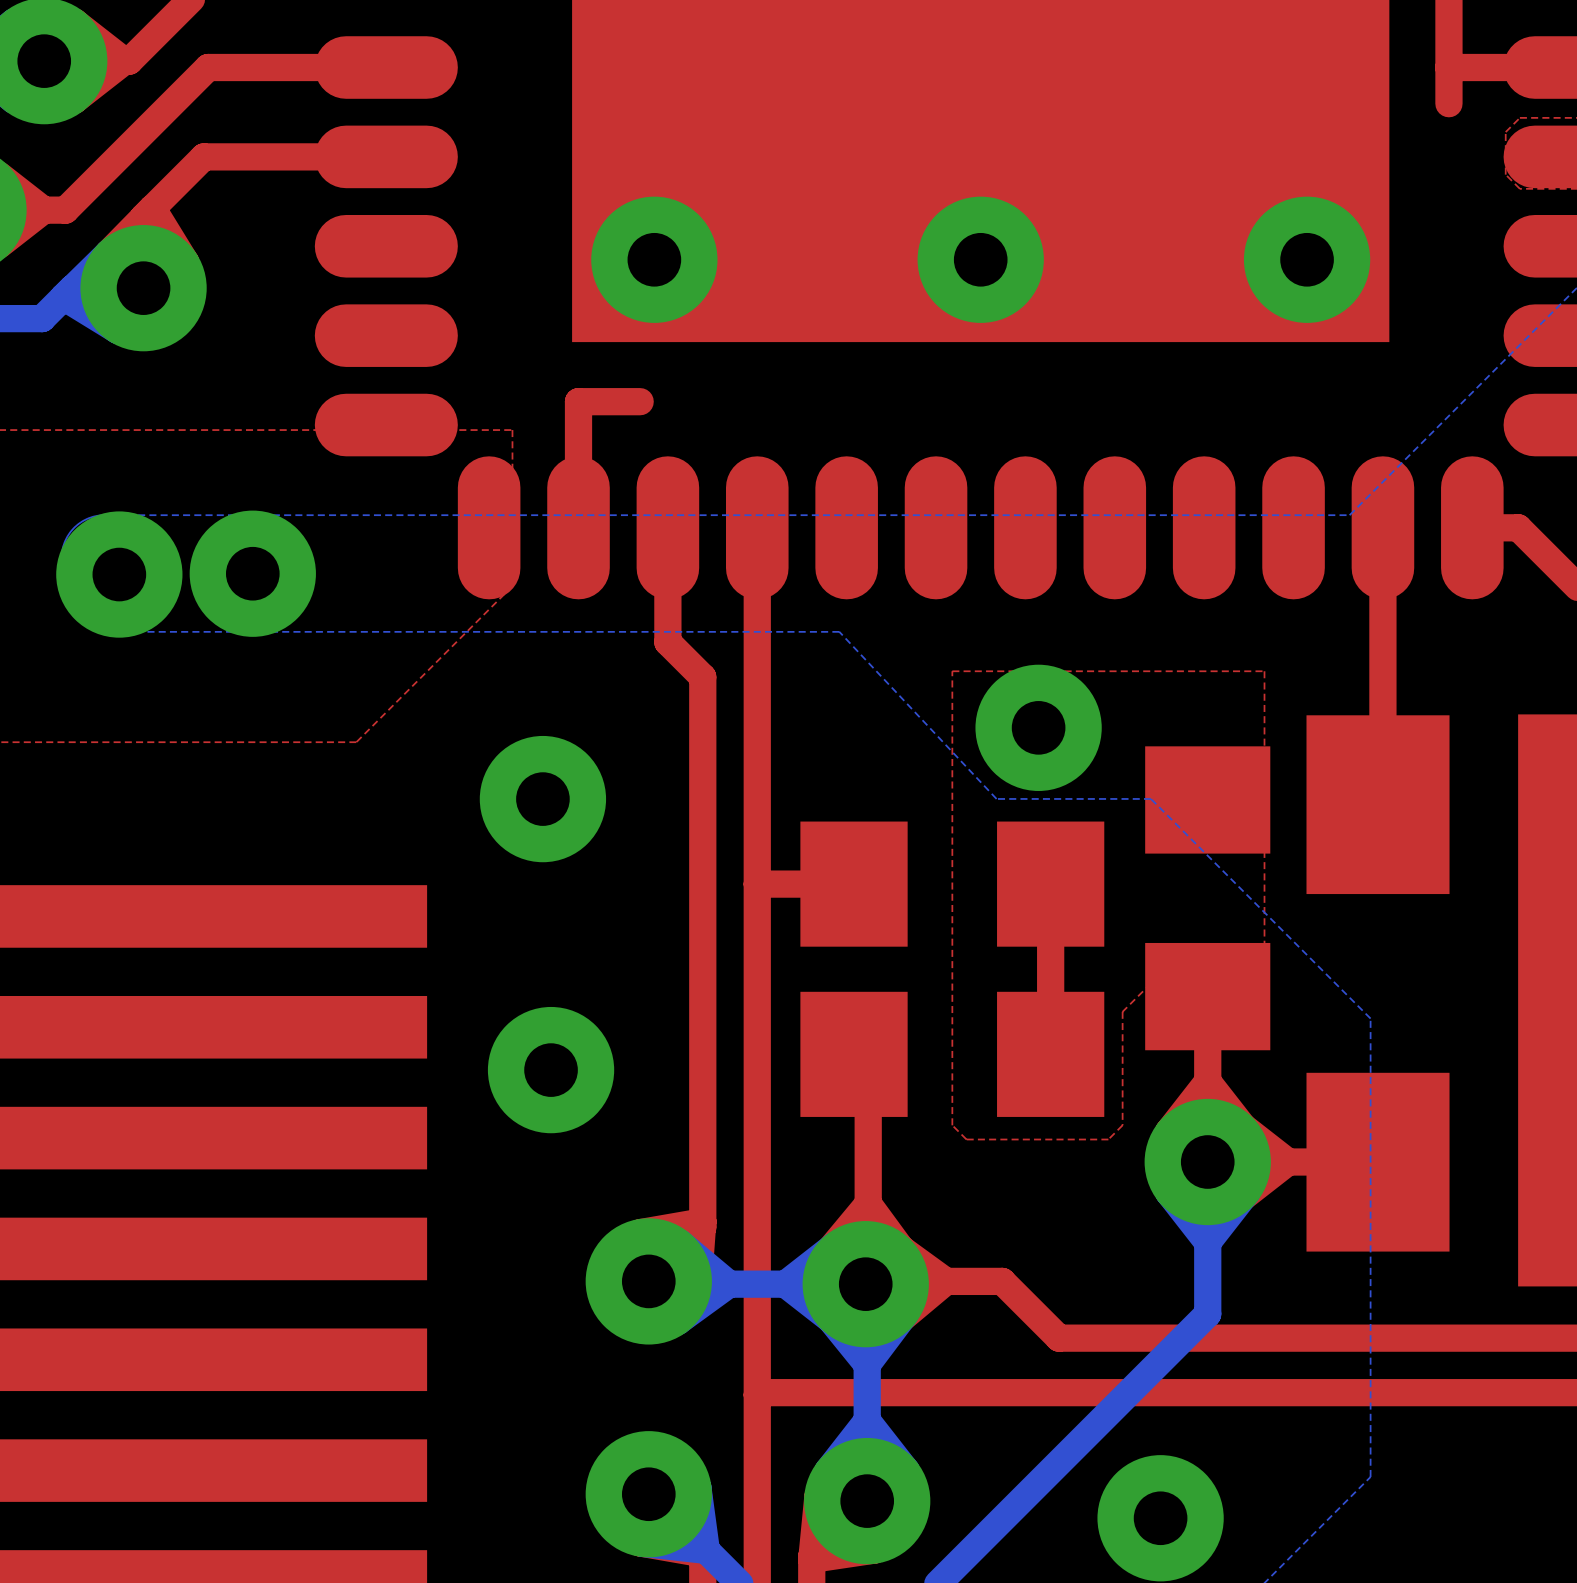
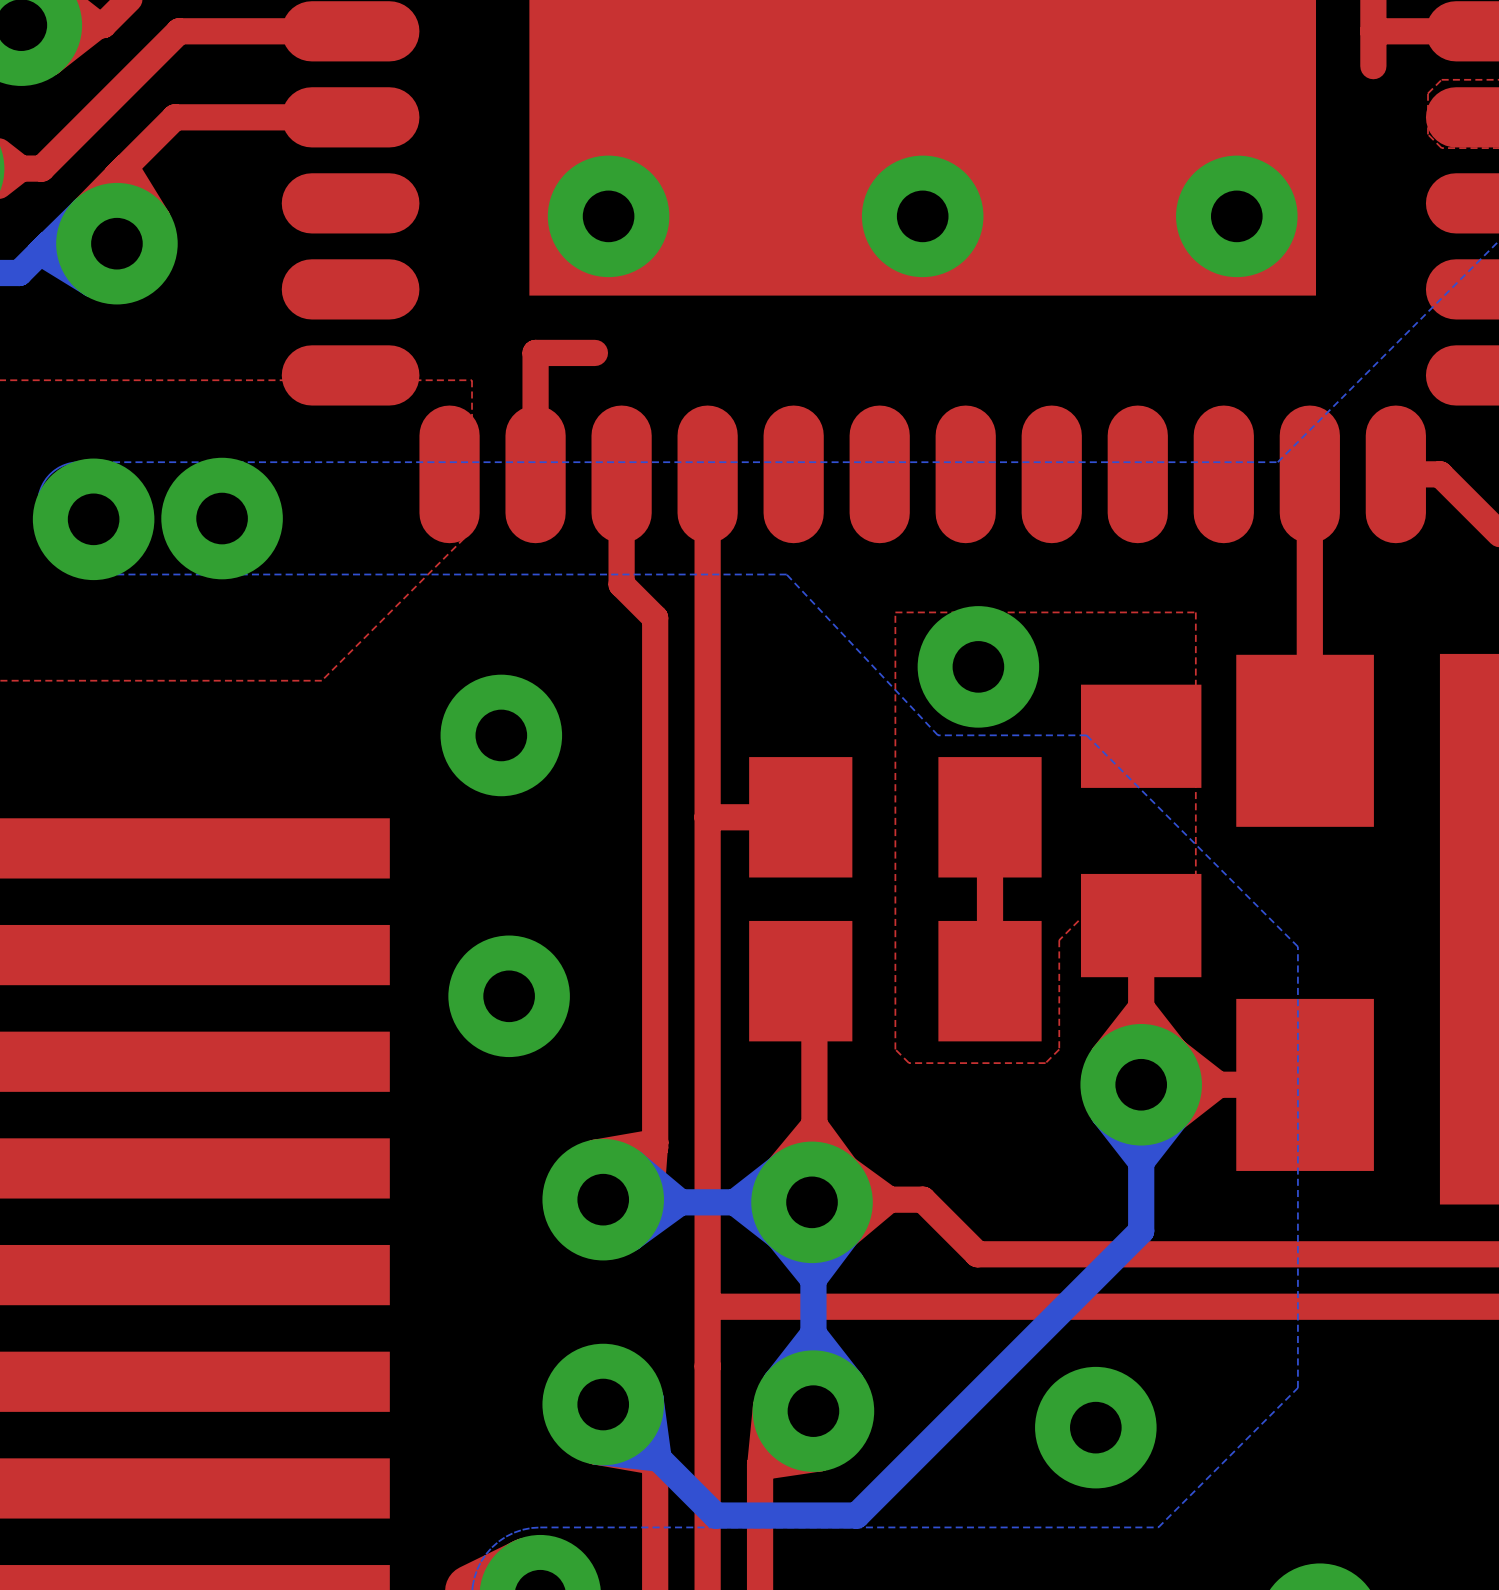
top track: (980, 1281) (1002, 1281) (1059, 1338) -> (922, 1199) (977, 1254) (998, 1254)

